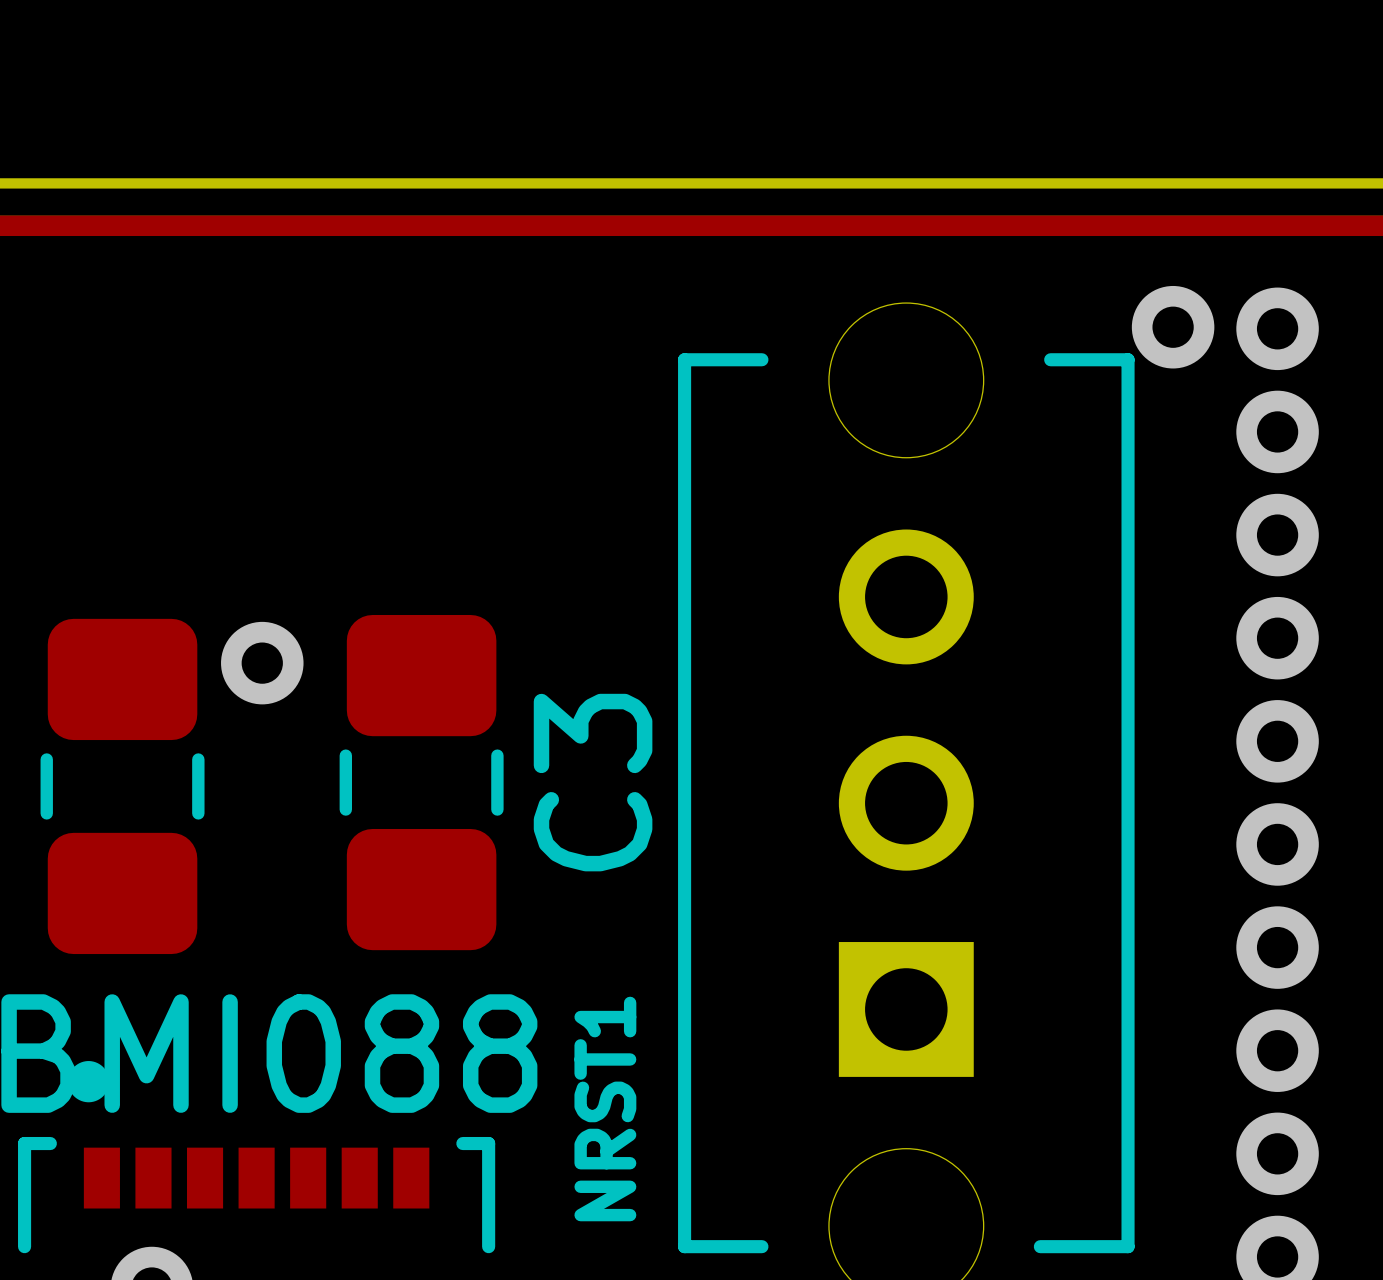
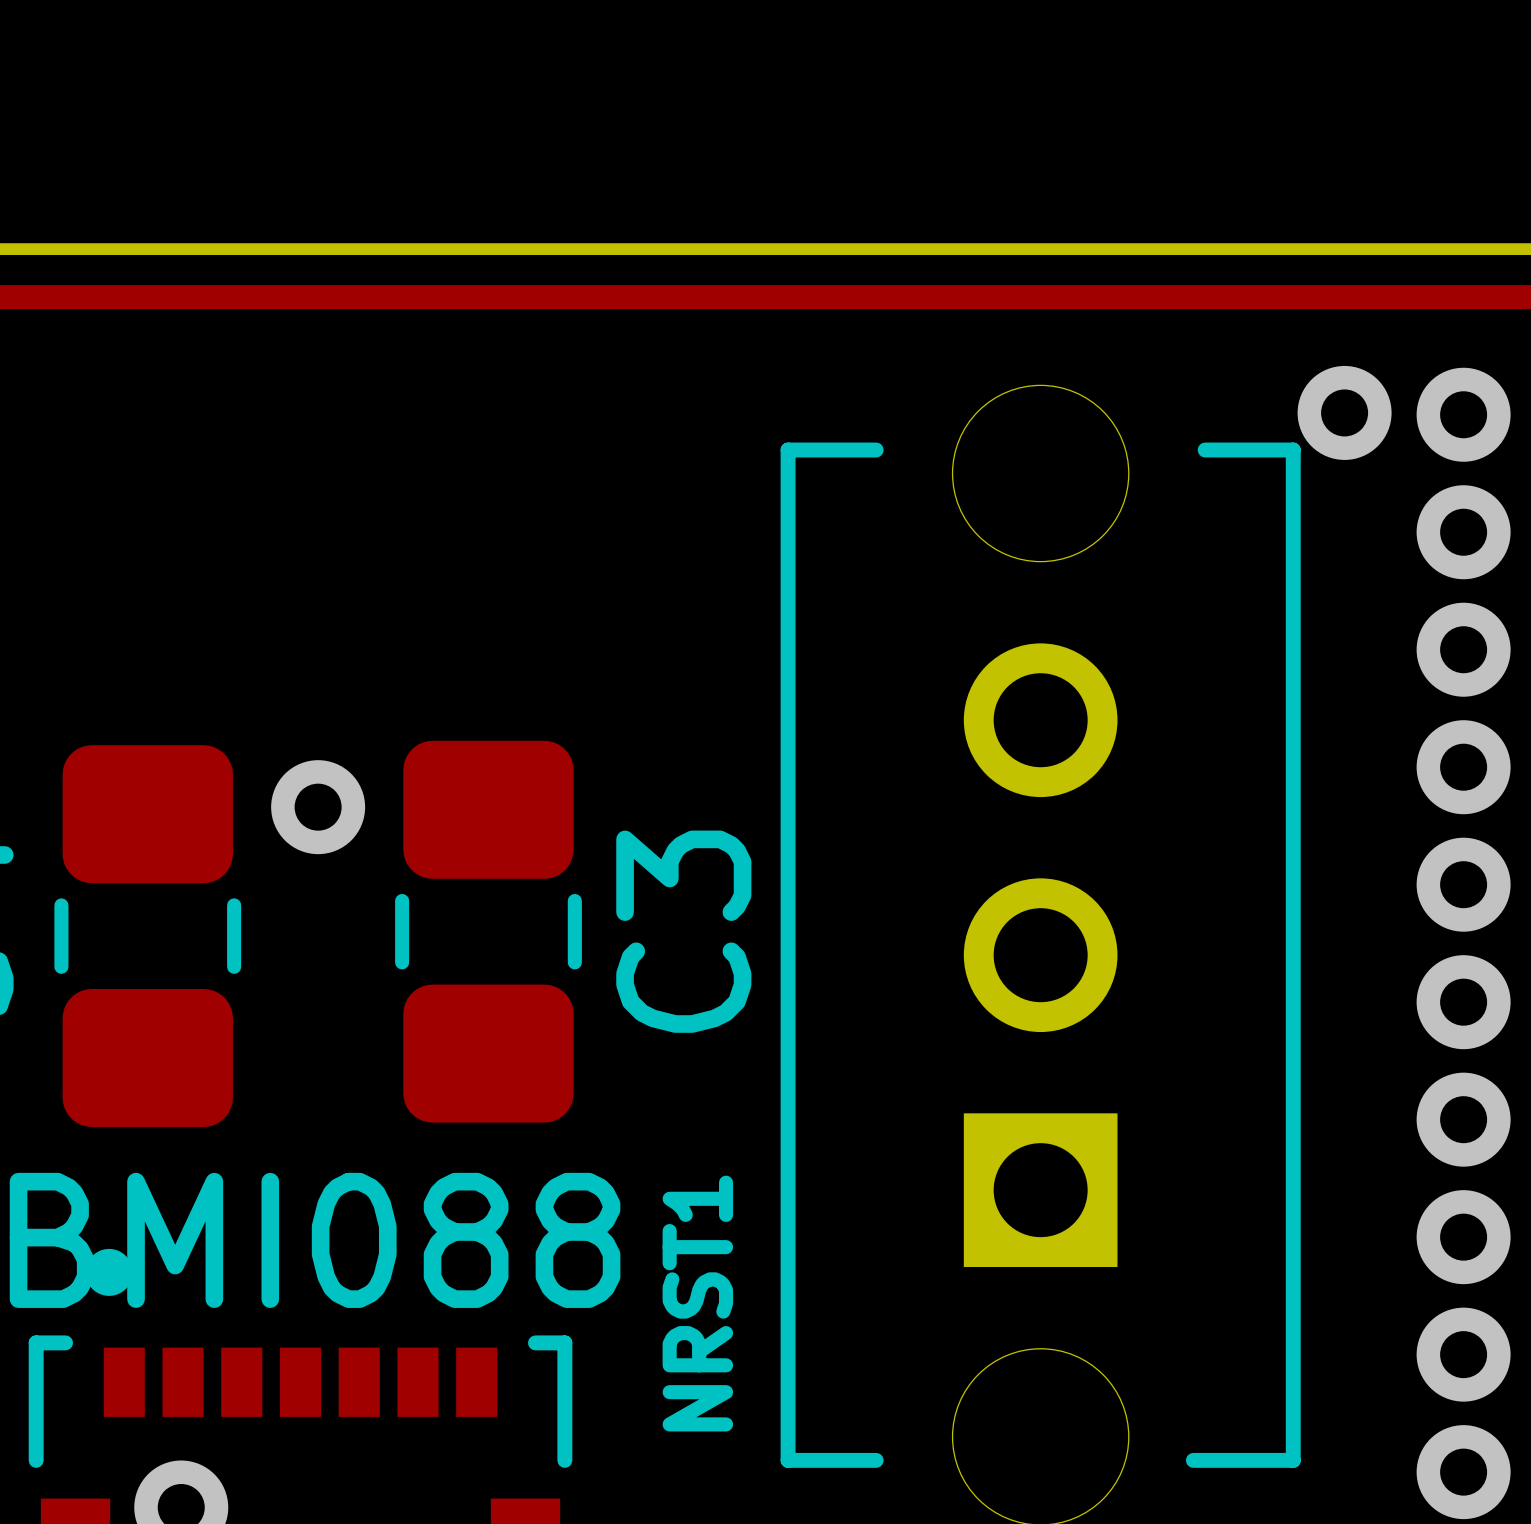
via position: (262, 663) -> (318, 807)

